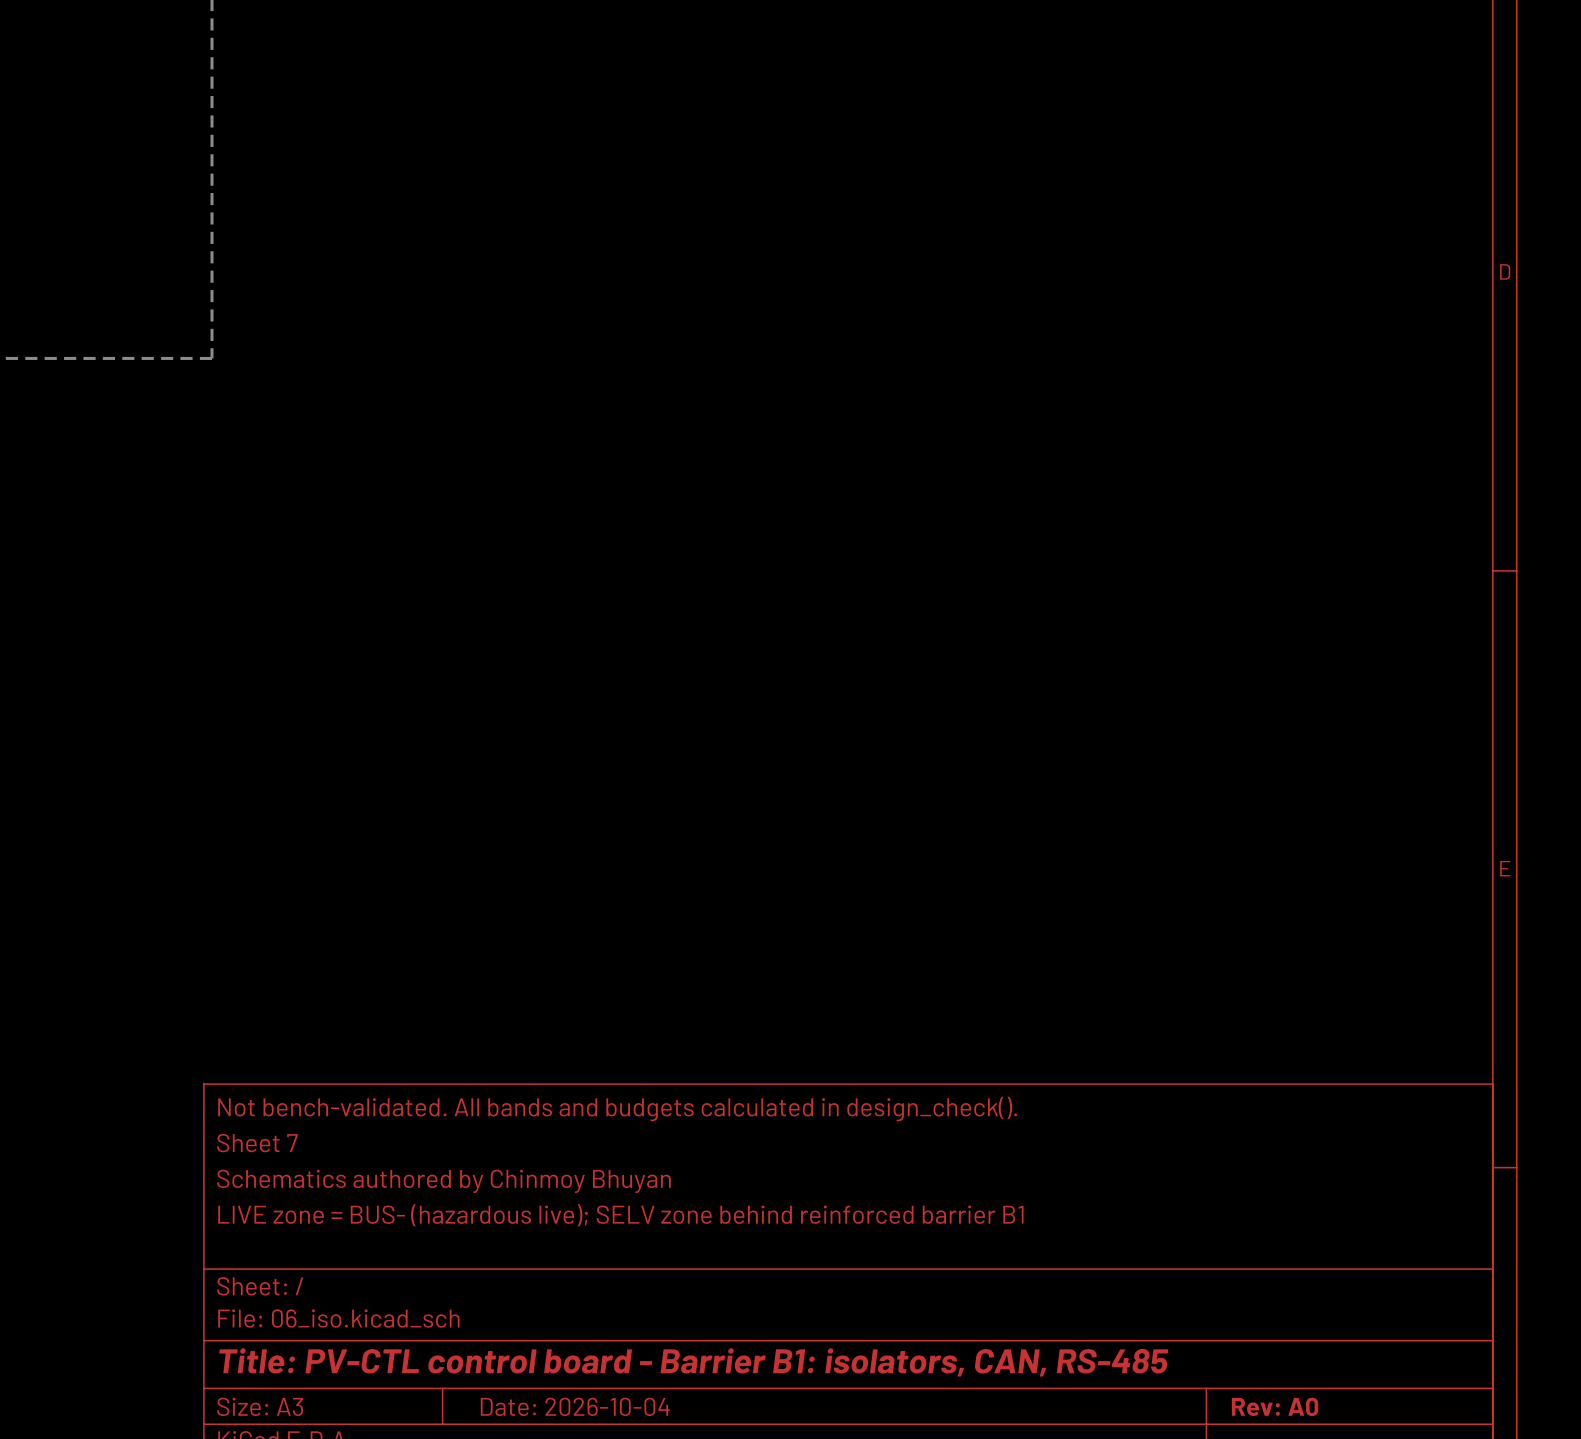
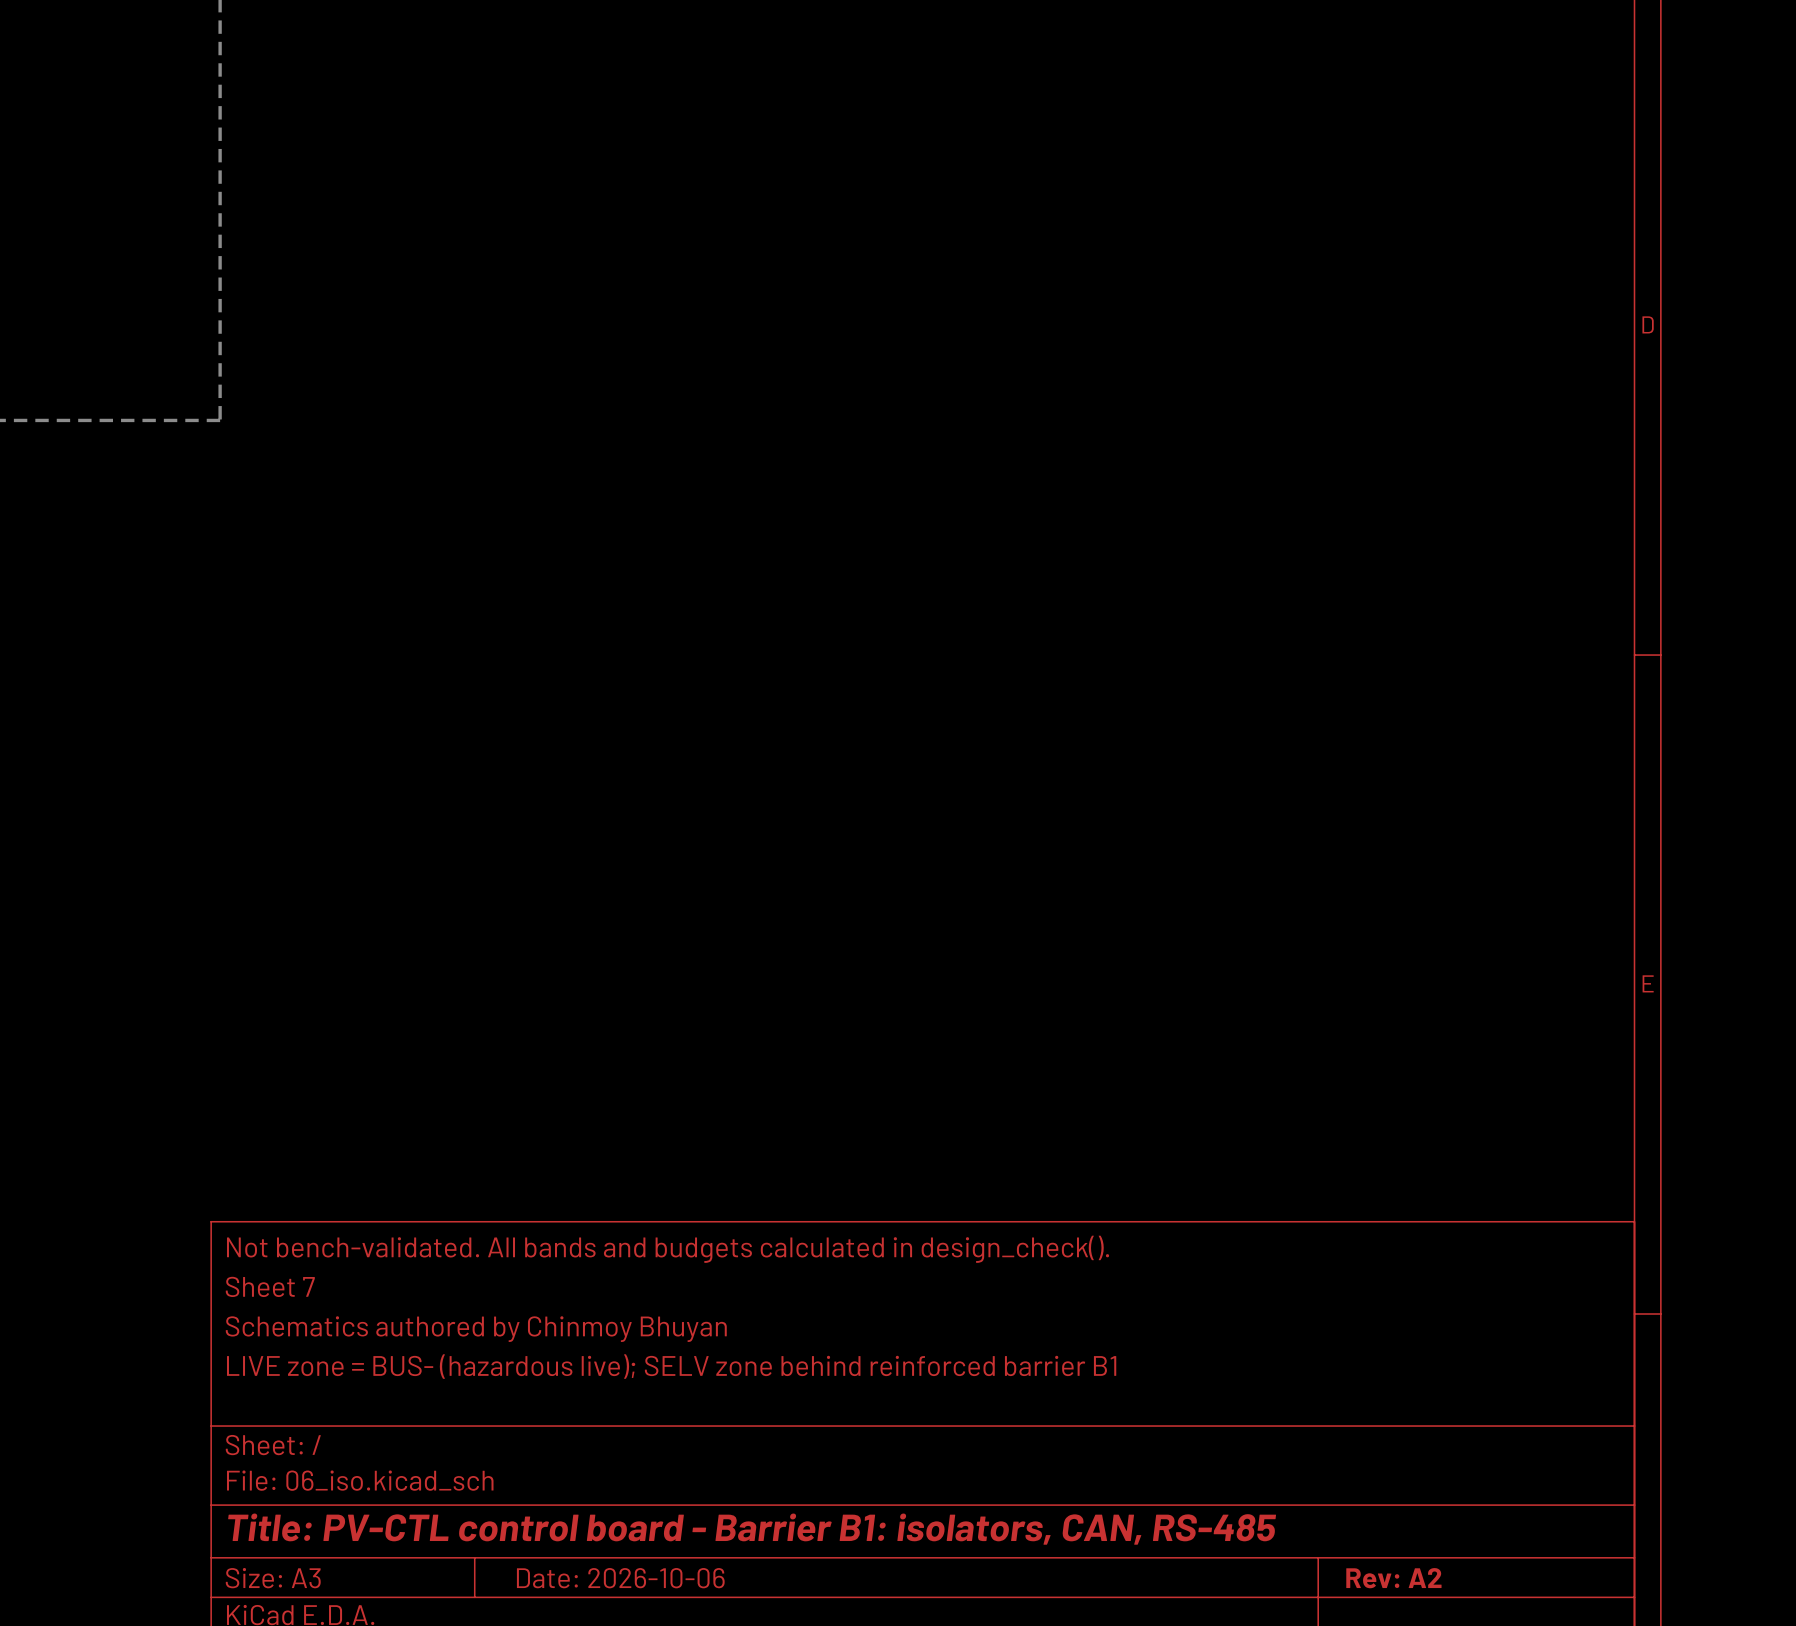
title block: Date: 2026-10-04 (575, 1406) -> Date: 2026-10-06 (620, 1578)
title block: Rev: A0 (1275, 1406) -> Rev: A2 (1393, 1578)

